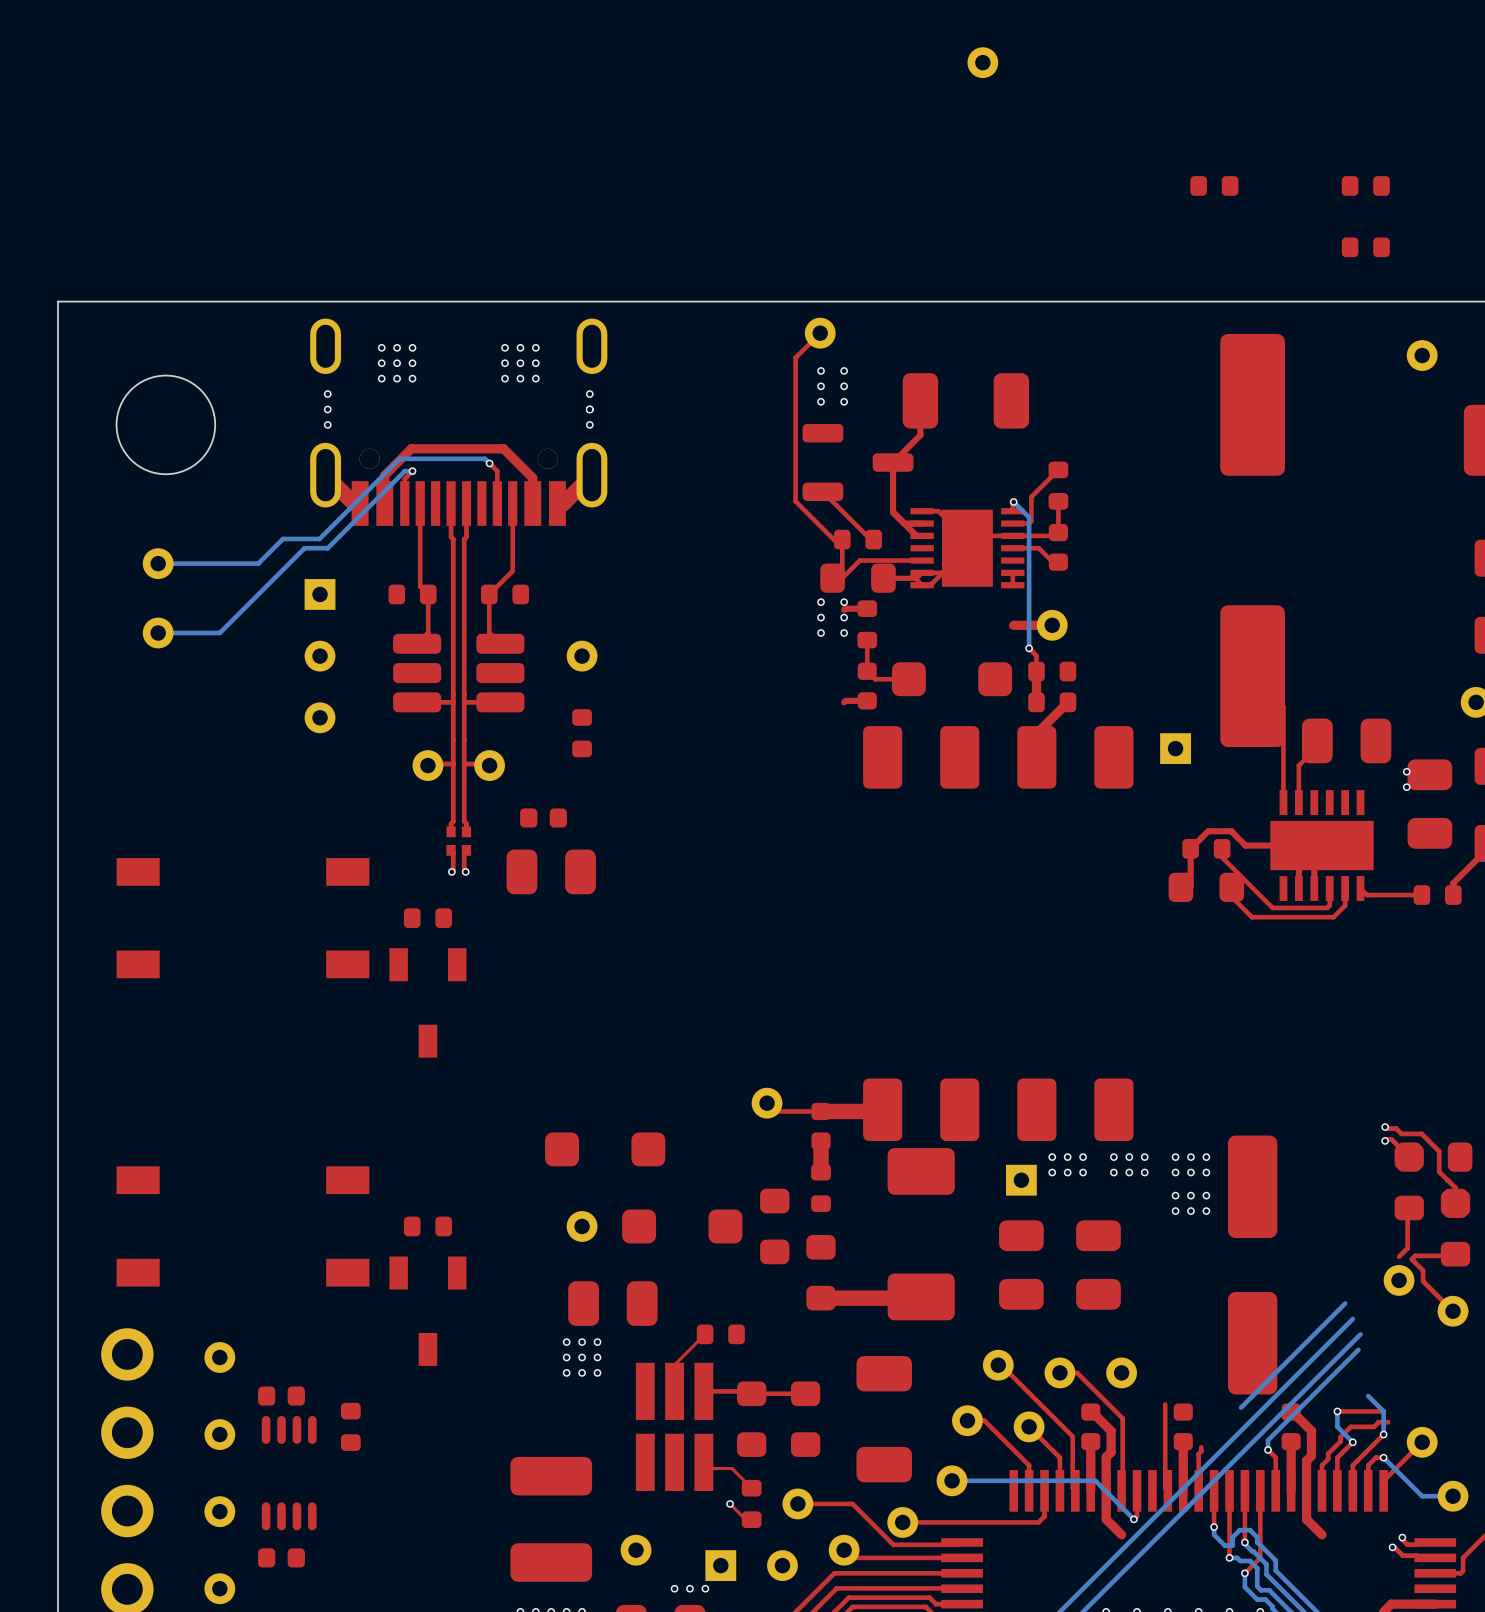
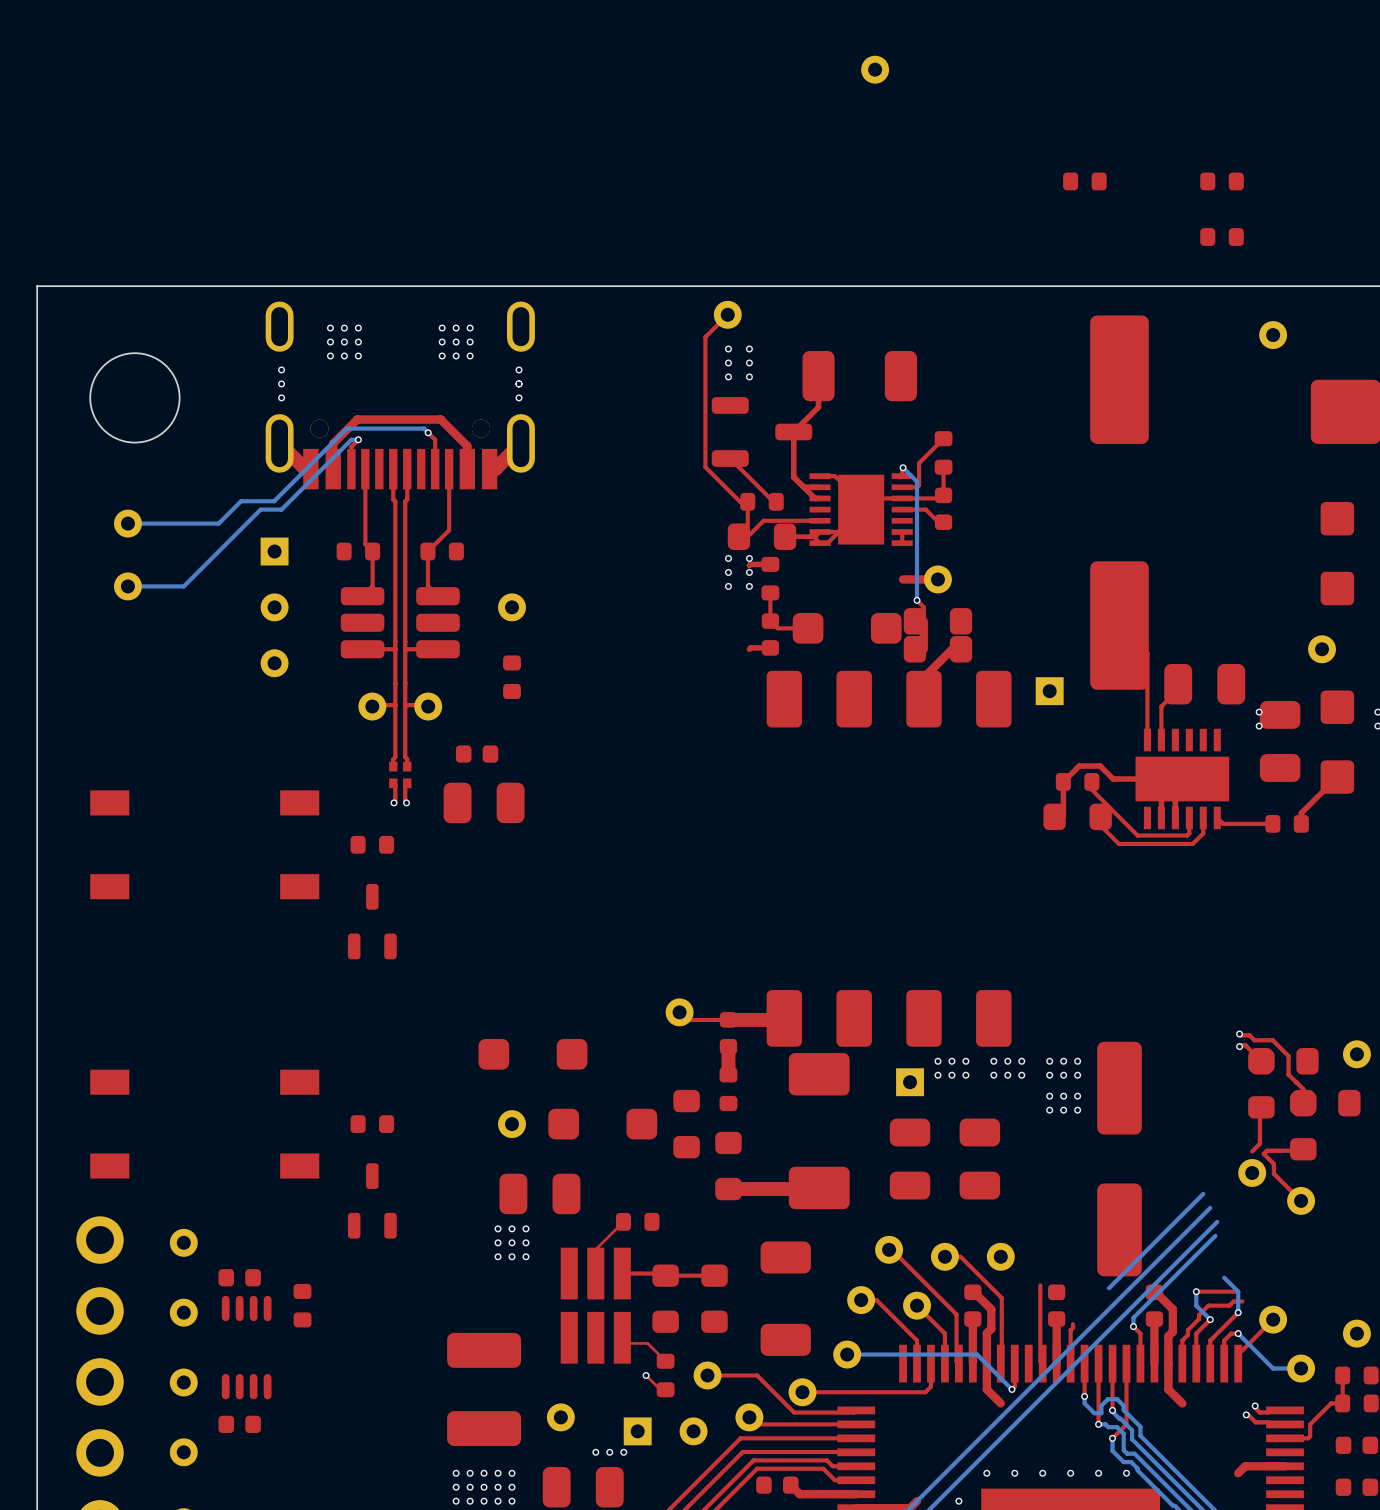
part footprint: [1028, 661, 1077, 682] -> [903, 608, 973, 635]
part footprint: [1028, 692, 1077, 713] -> [903, 636, 973, 663]
part footprint: [389, 948, 467, 1058] -> [347, 883, 397, 960]
part footprint: [389, 1256, 467, 1366] -> [347, 1163, 397, 1239]

